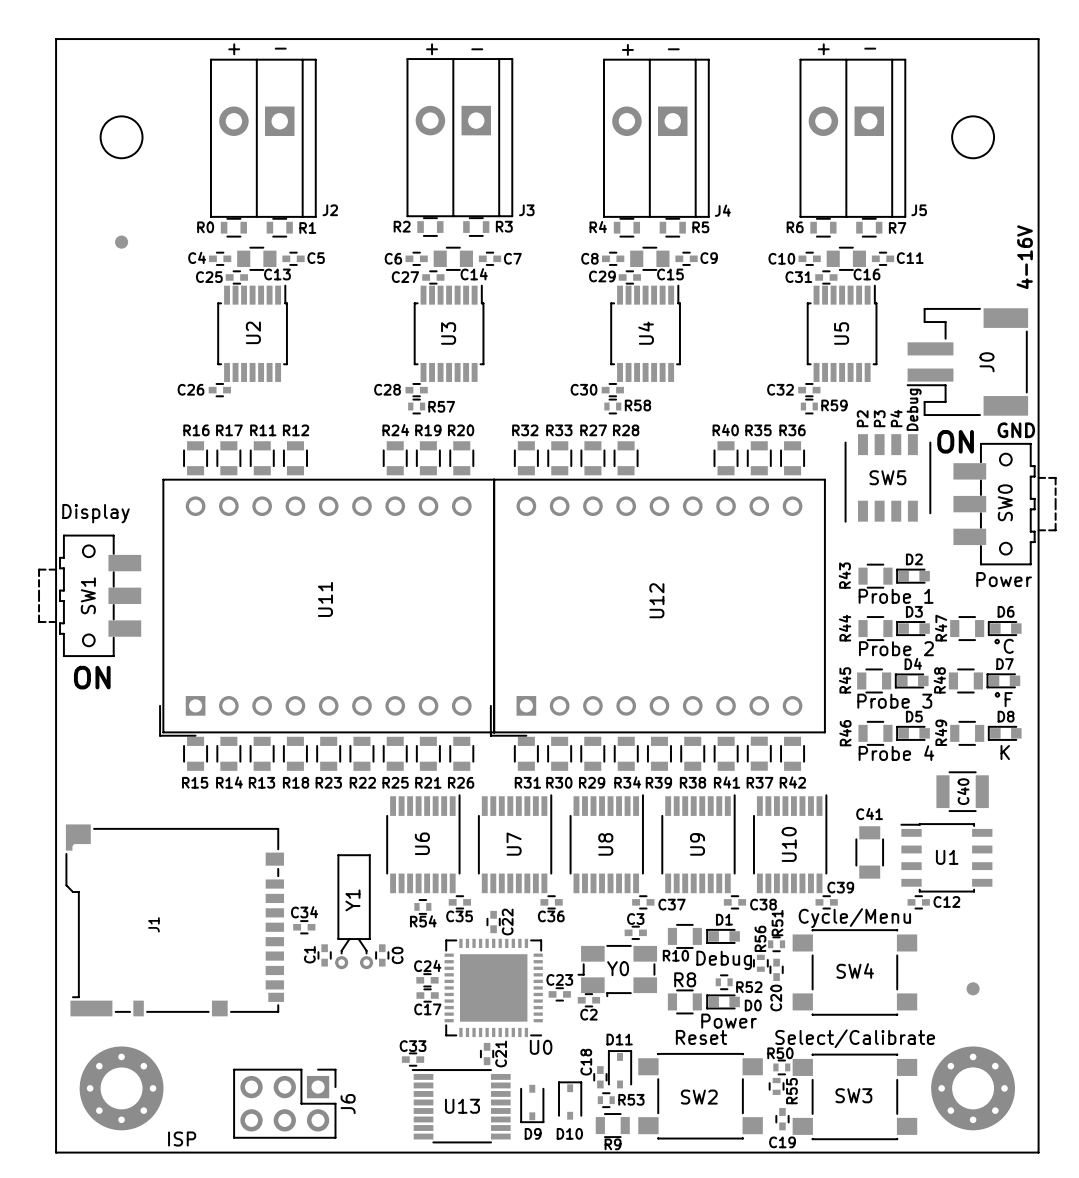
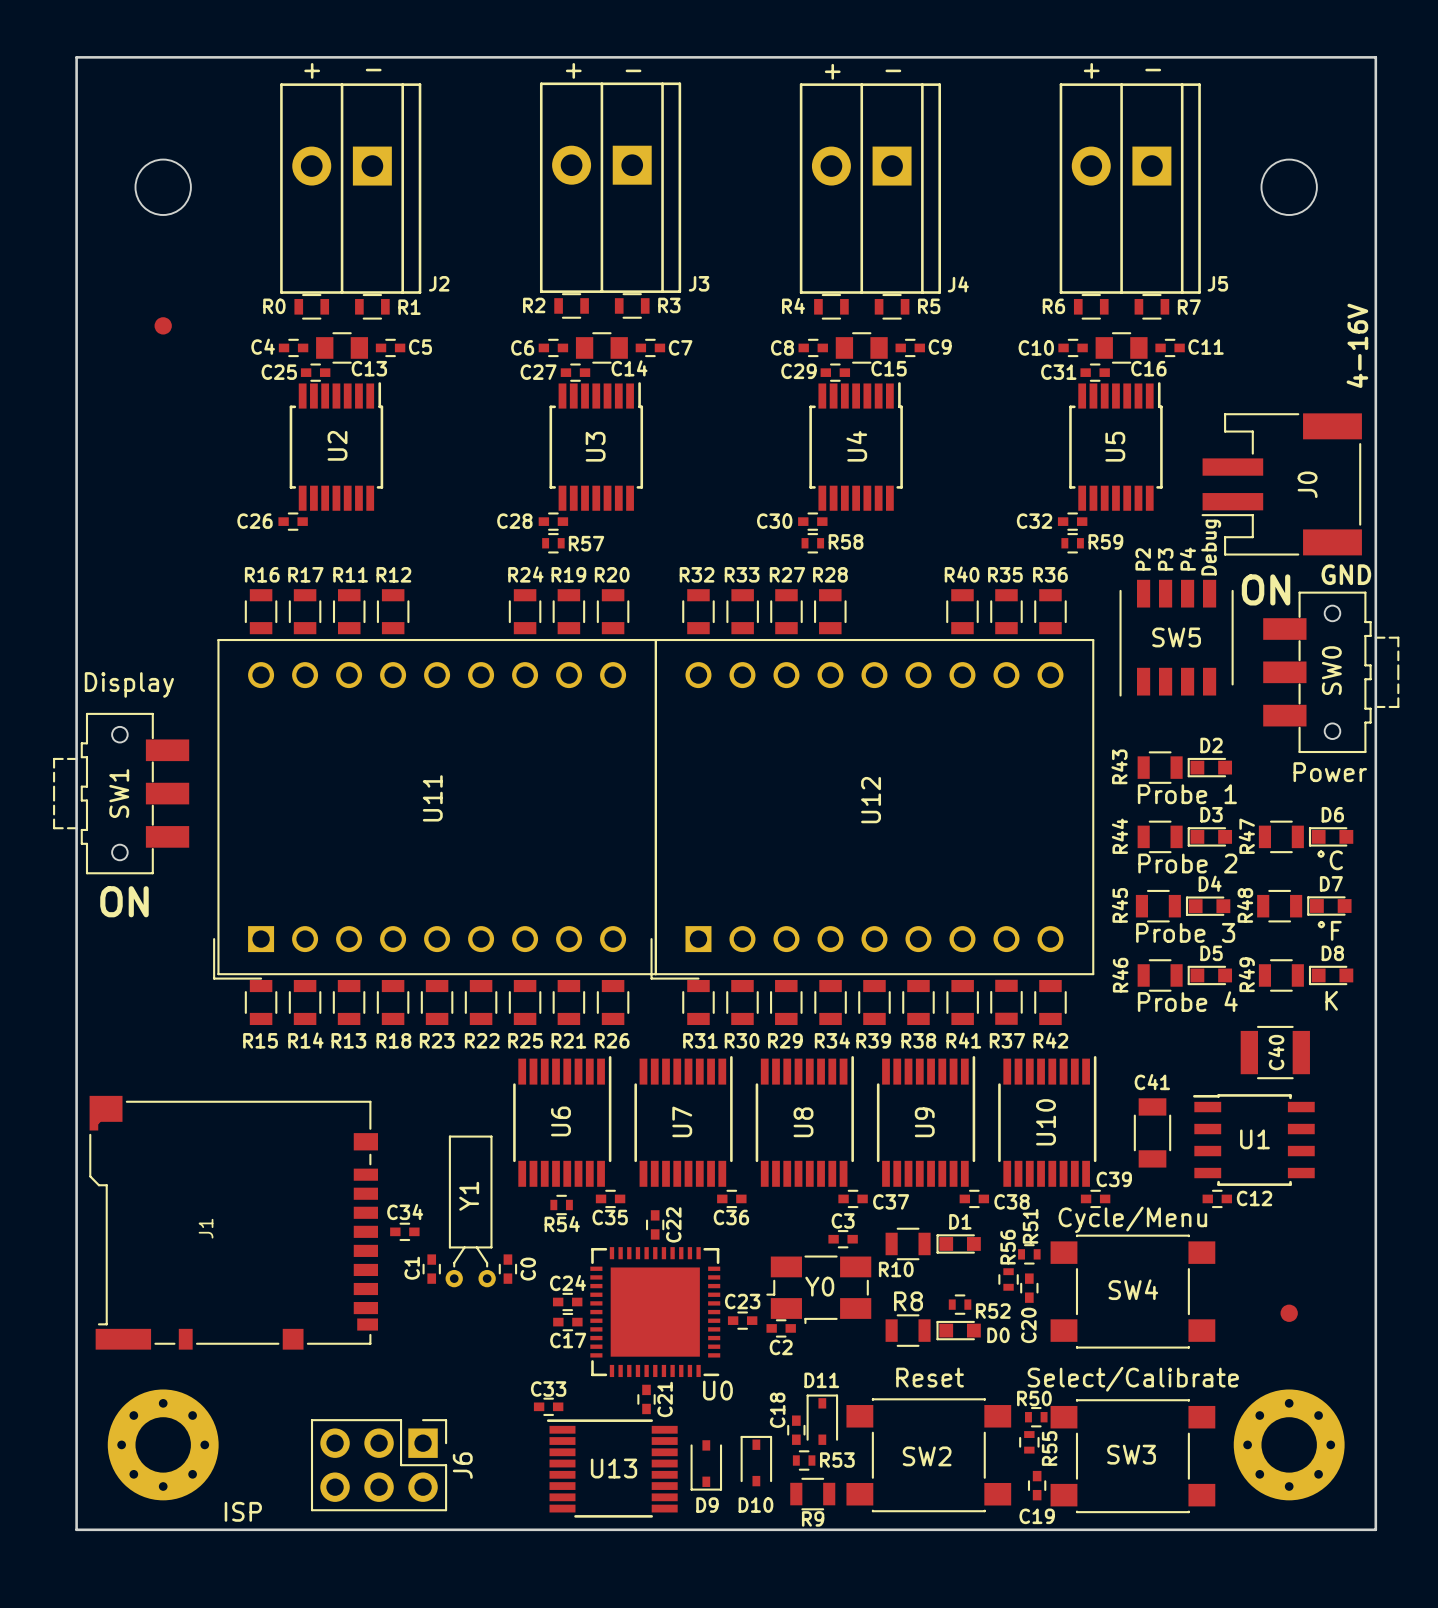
text: Debug (724, 960) -> none
text: Power (729, 1021) -> none

